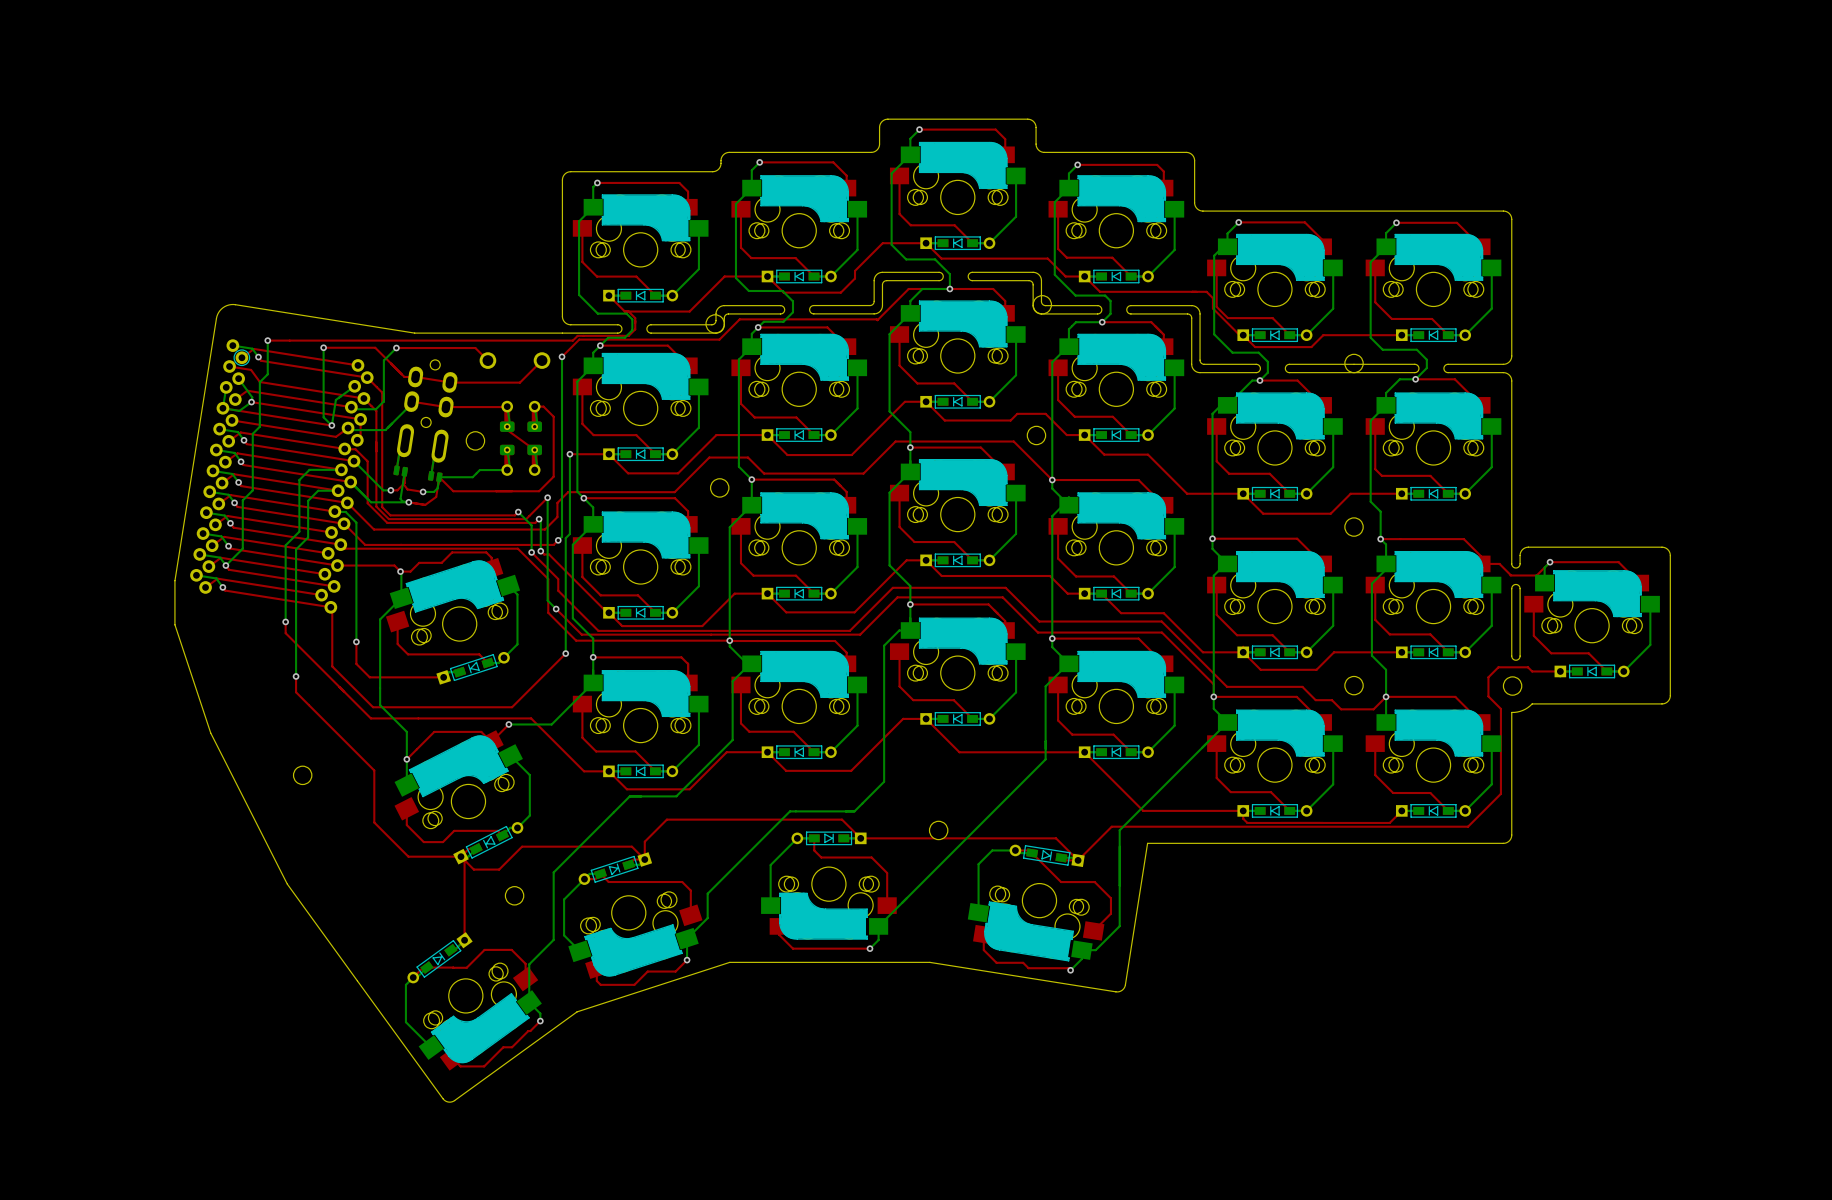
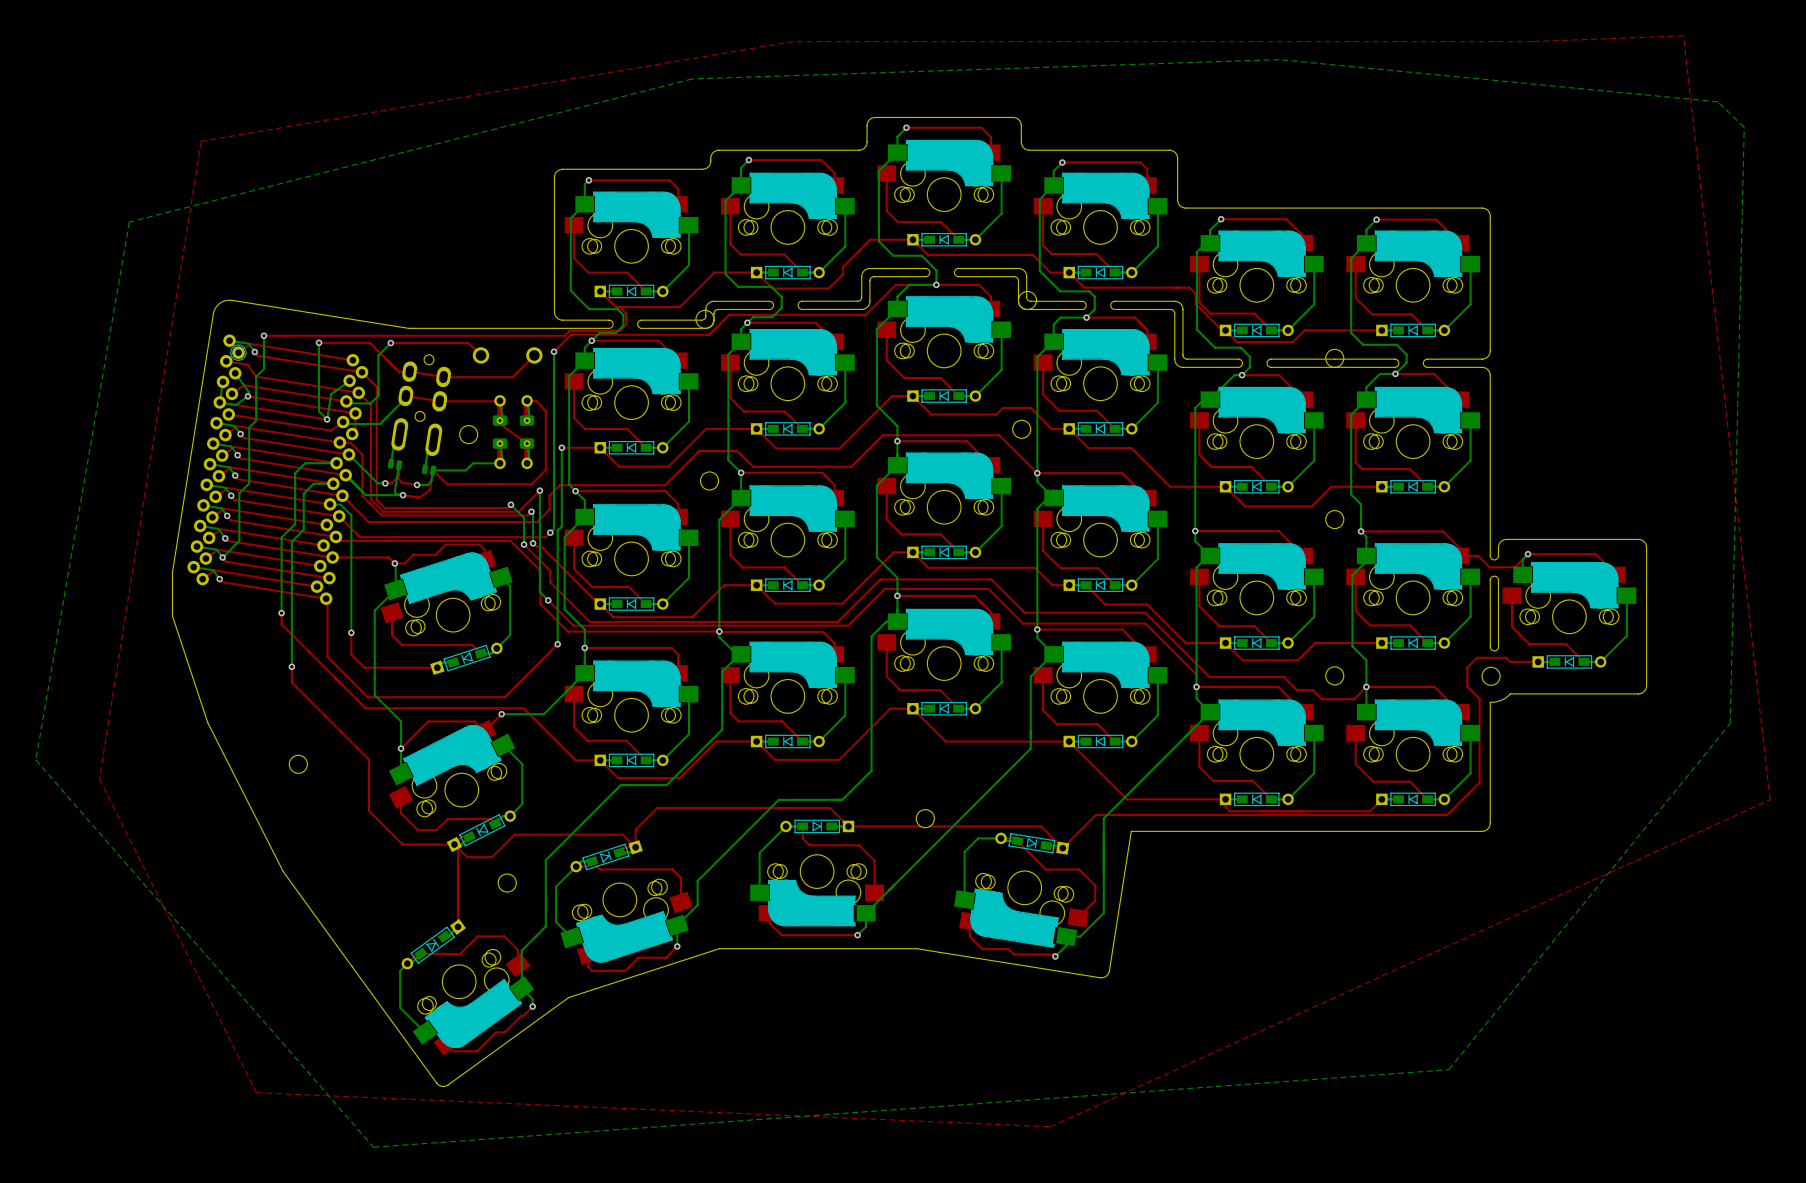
top zone outline: none -> (1683, 35) (1770, 799) (1050, 1126) (256, 1092) (99, 778) (201, 141) (793, 41) (1532, 41) (1683, 35)
bottom zone outline: none -> (1279, 59) (1717, 101) (1744, 127) (1730, 723) (1448, 1069) (373, 1147) (35, 759) (129, 222) (692, 78) (1279, 59)

